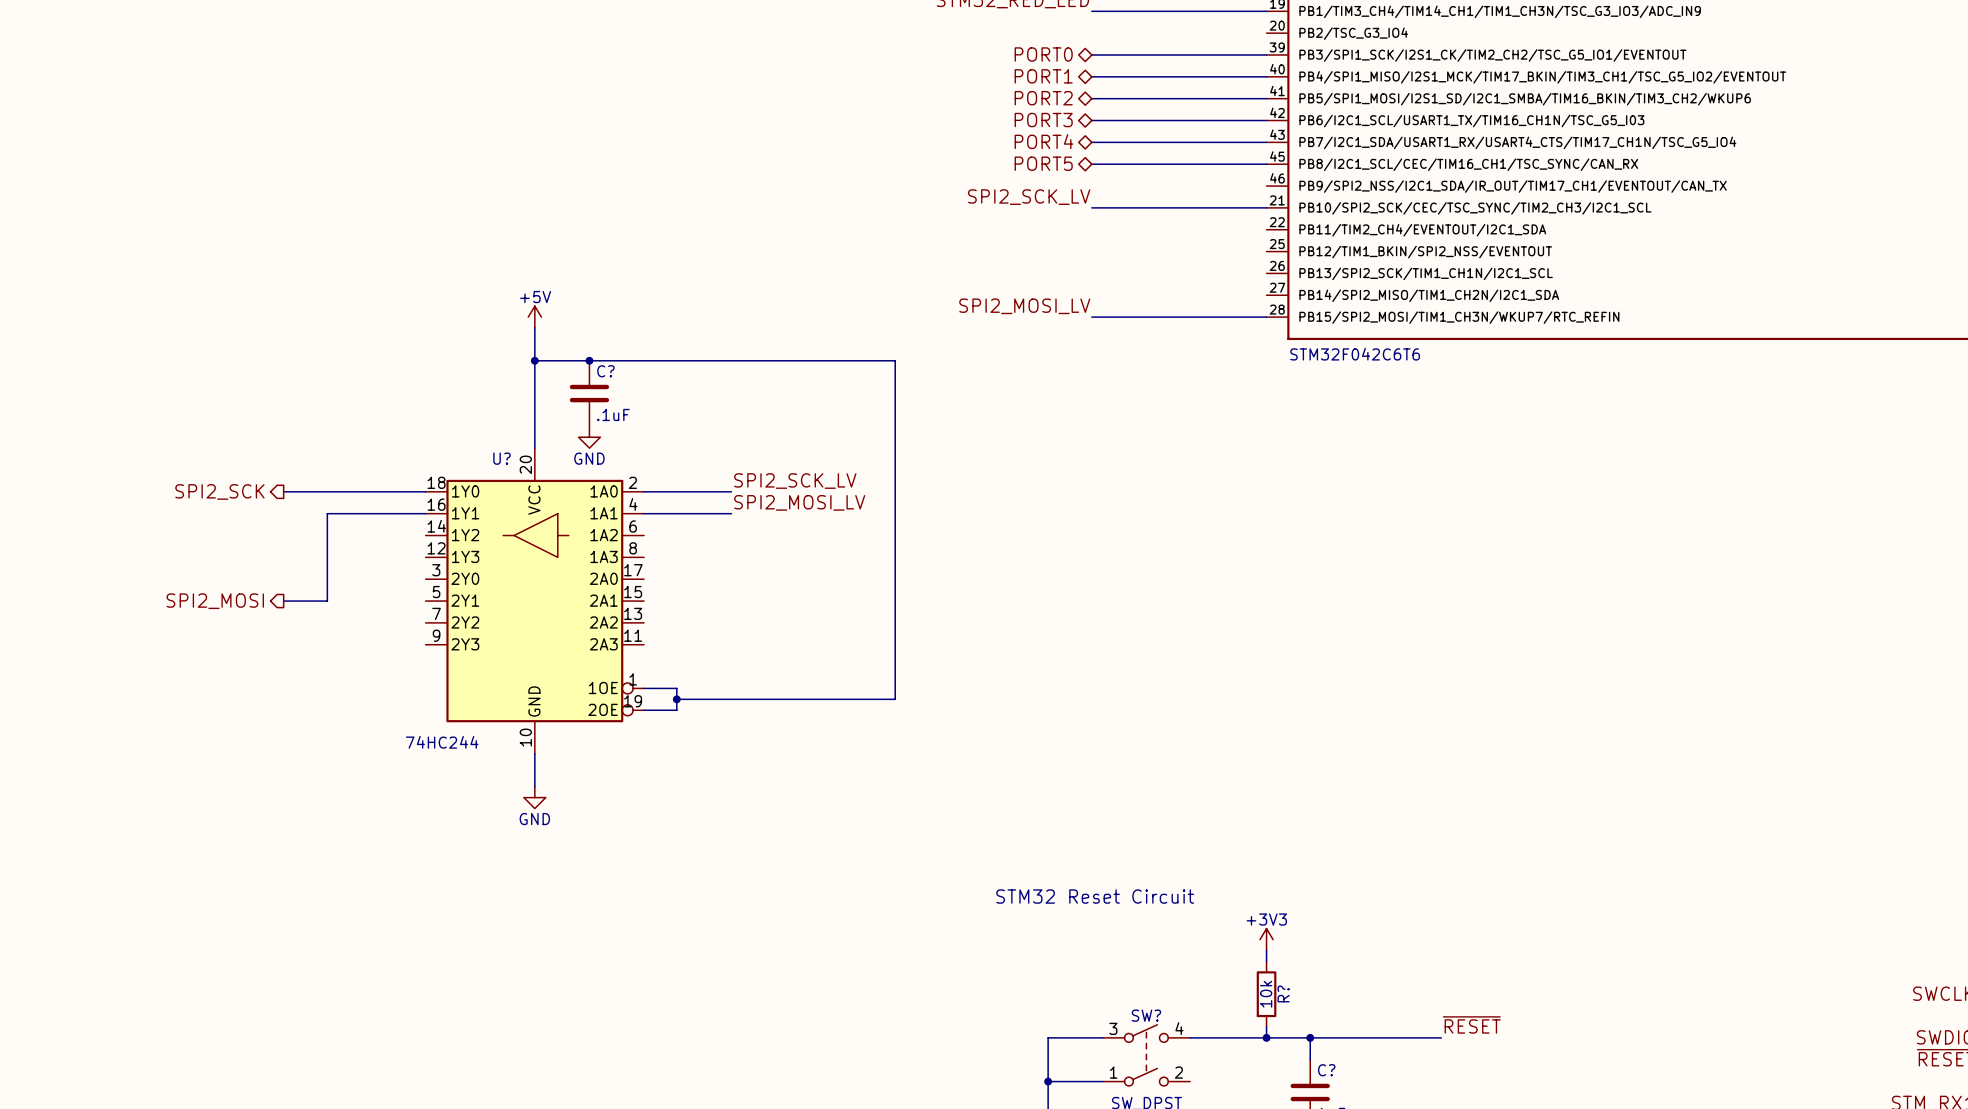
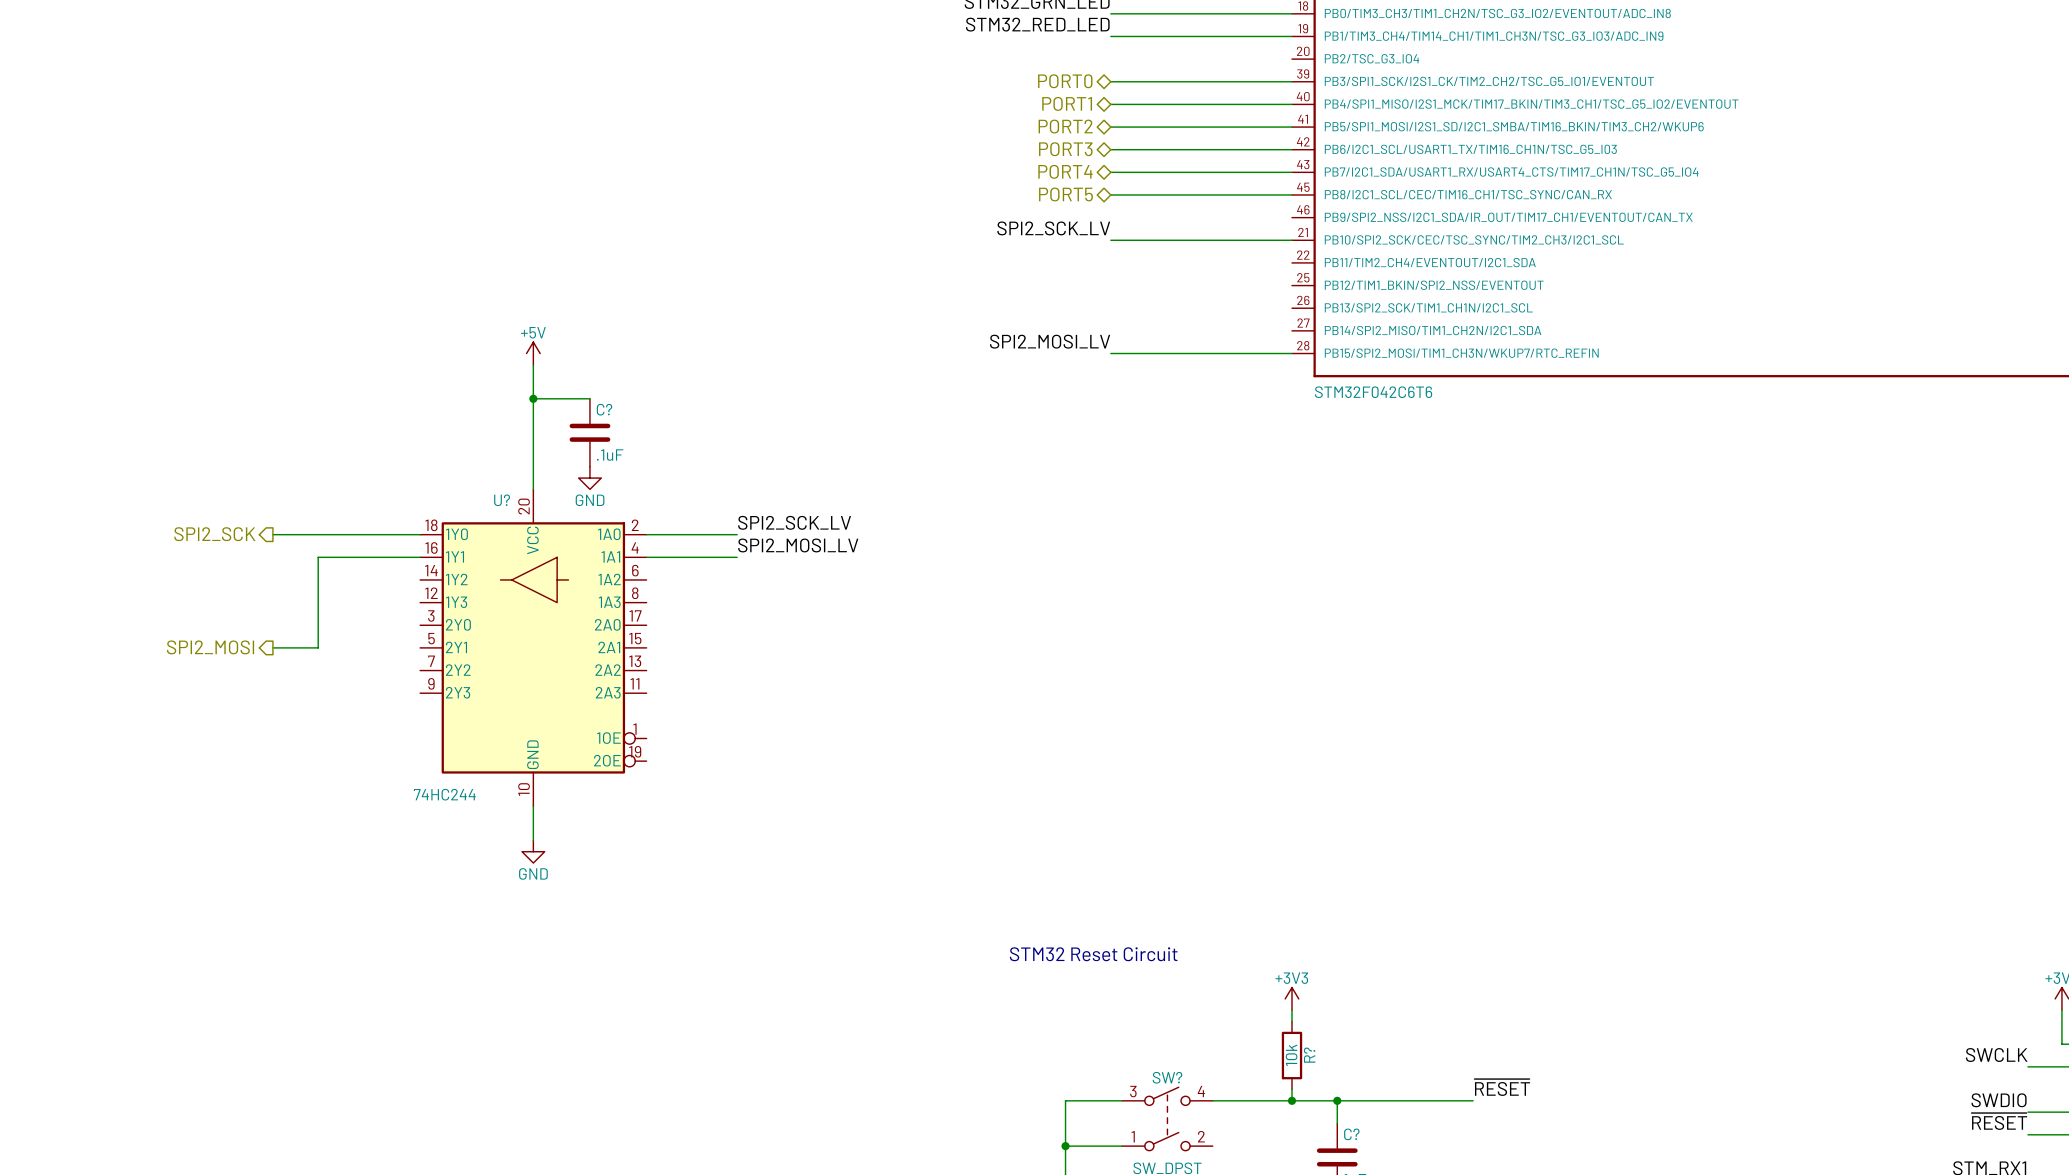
wire: (589, 360) (895, 360) (895, 699) (676, 699) -> none
junction: (589, 360) -> none
wire: (644, 688) (676, 688) (676, 710) (644, 710) -> none
junction: (676, 699) -> none

